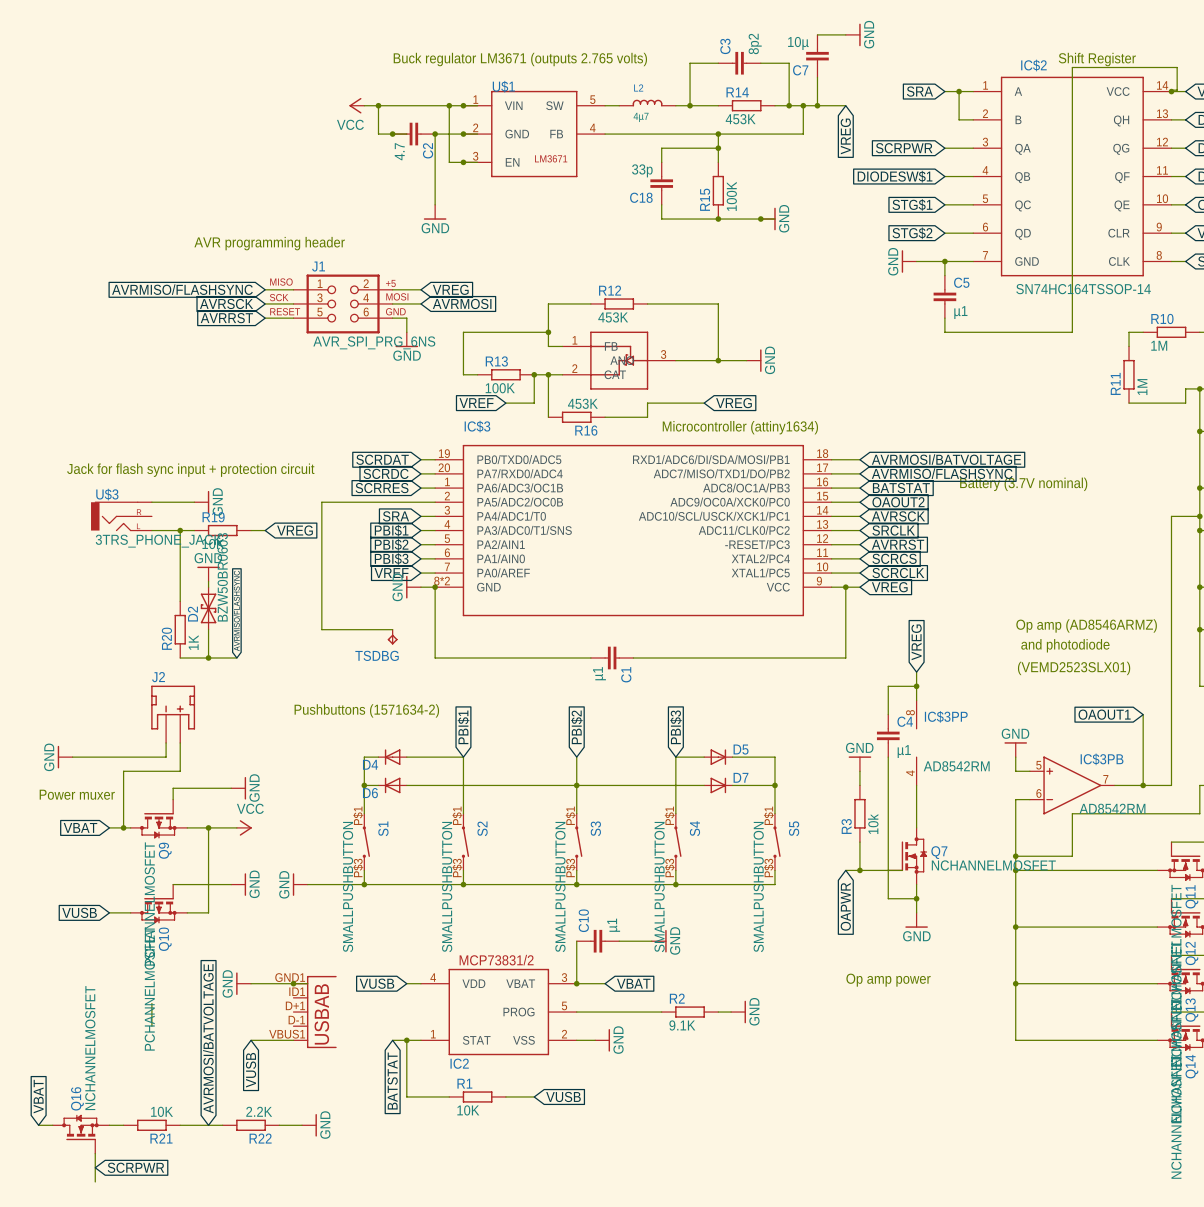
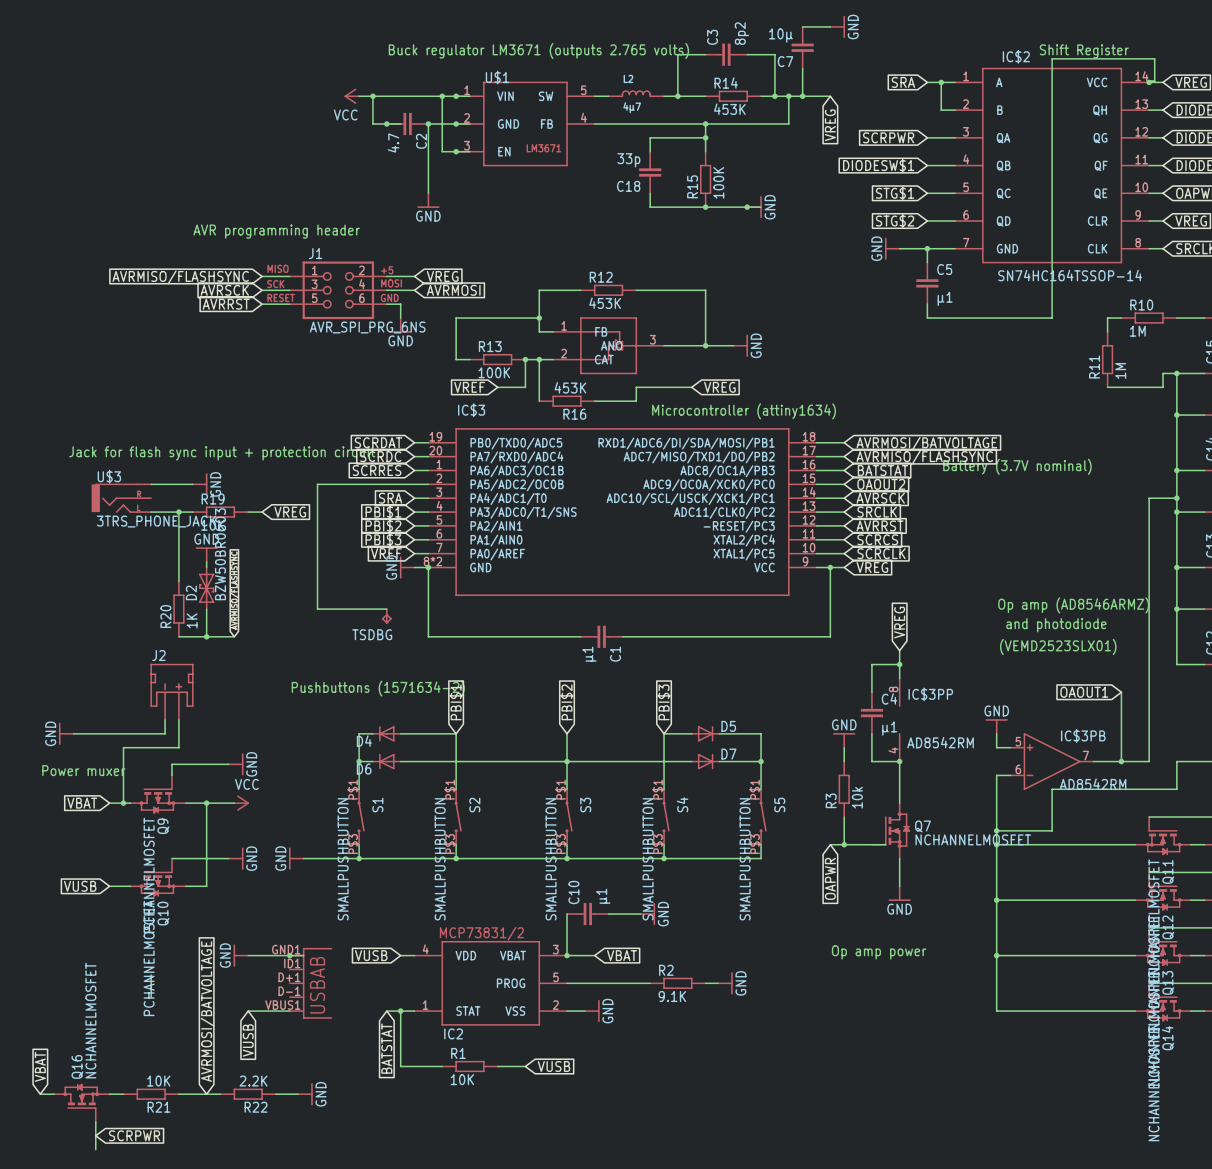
wire: (888, 785) (888, 898) (916, 898) -> (871, 761) (899, 761)
junction: none -> (899, 761)
junction: (916, 898) -> none

